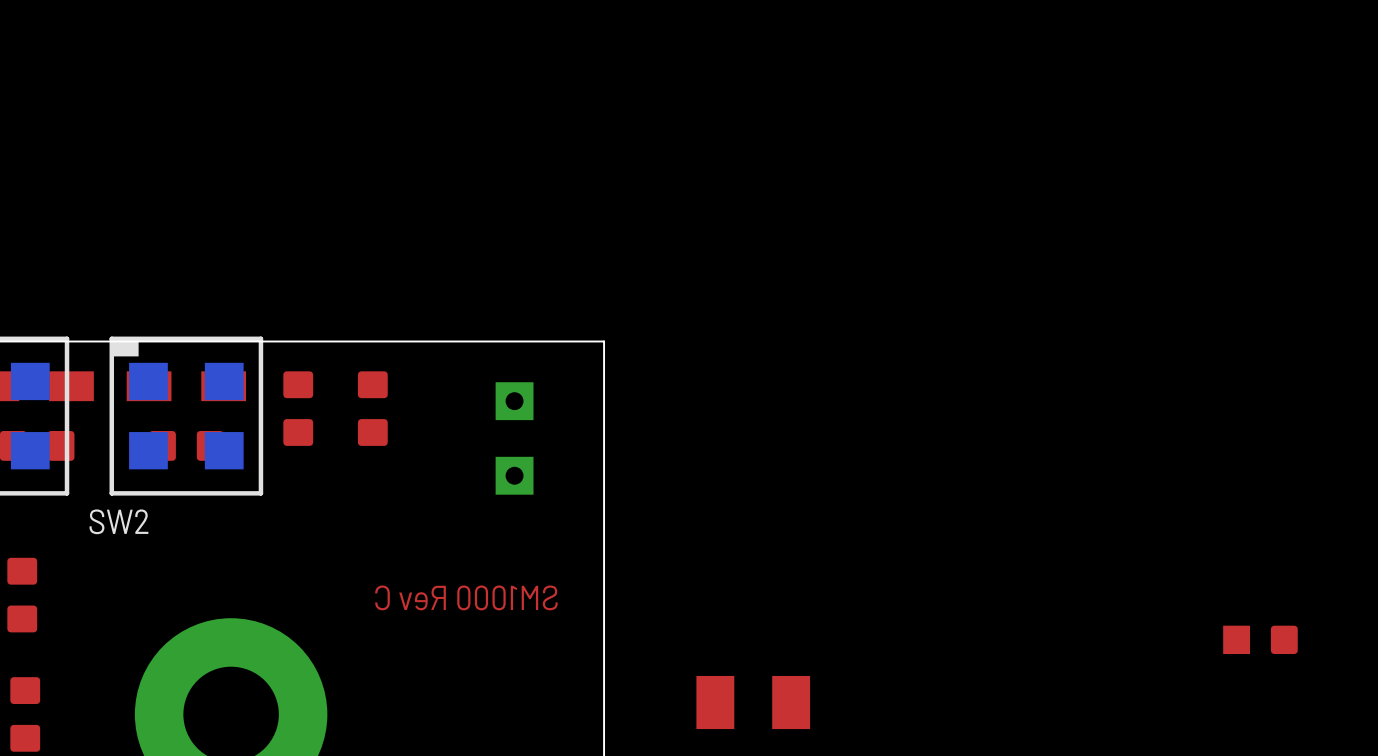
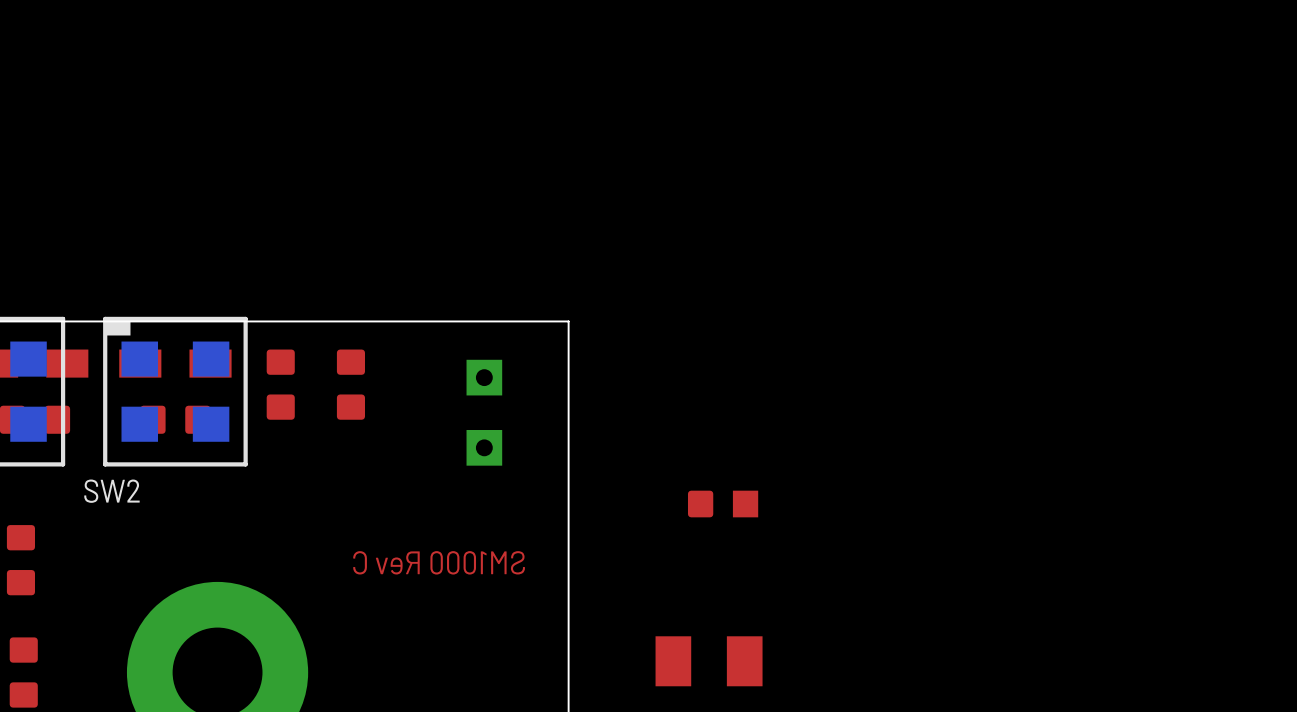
part rotation: 0° (1260, 639) -> 180° (723, 504)
part position: (1260, 639) -> (723, 504)

